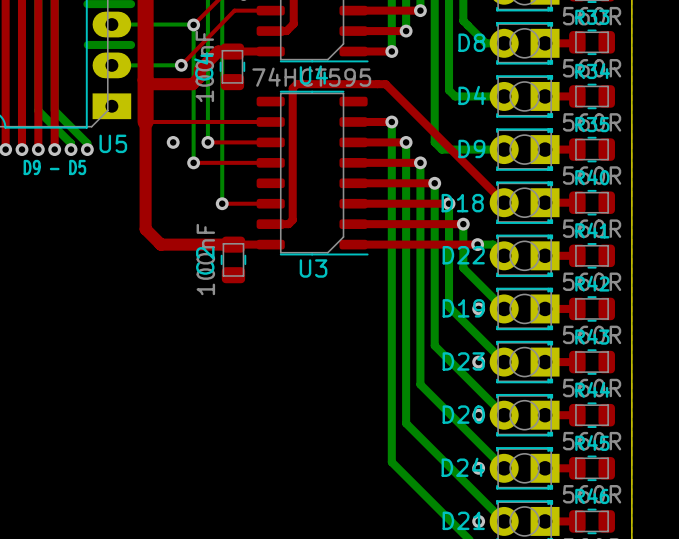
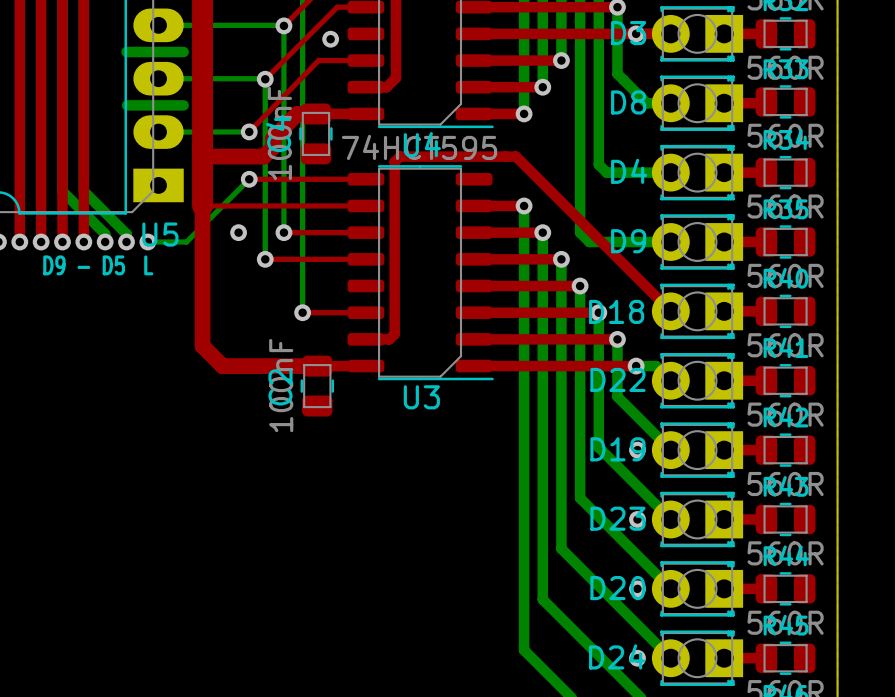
bottom track: none -> (249, 179) (186, 241) (147, 241)
top track: none -> (249, 179) (365, 179)
via: none -> (249, 179)
via: none -> (147, 241)
text: none -> L (148, 265)

